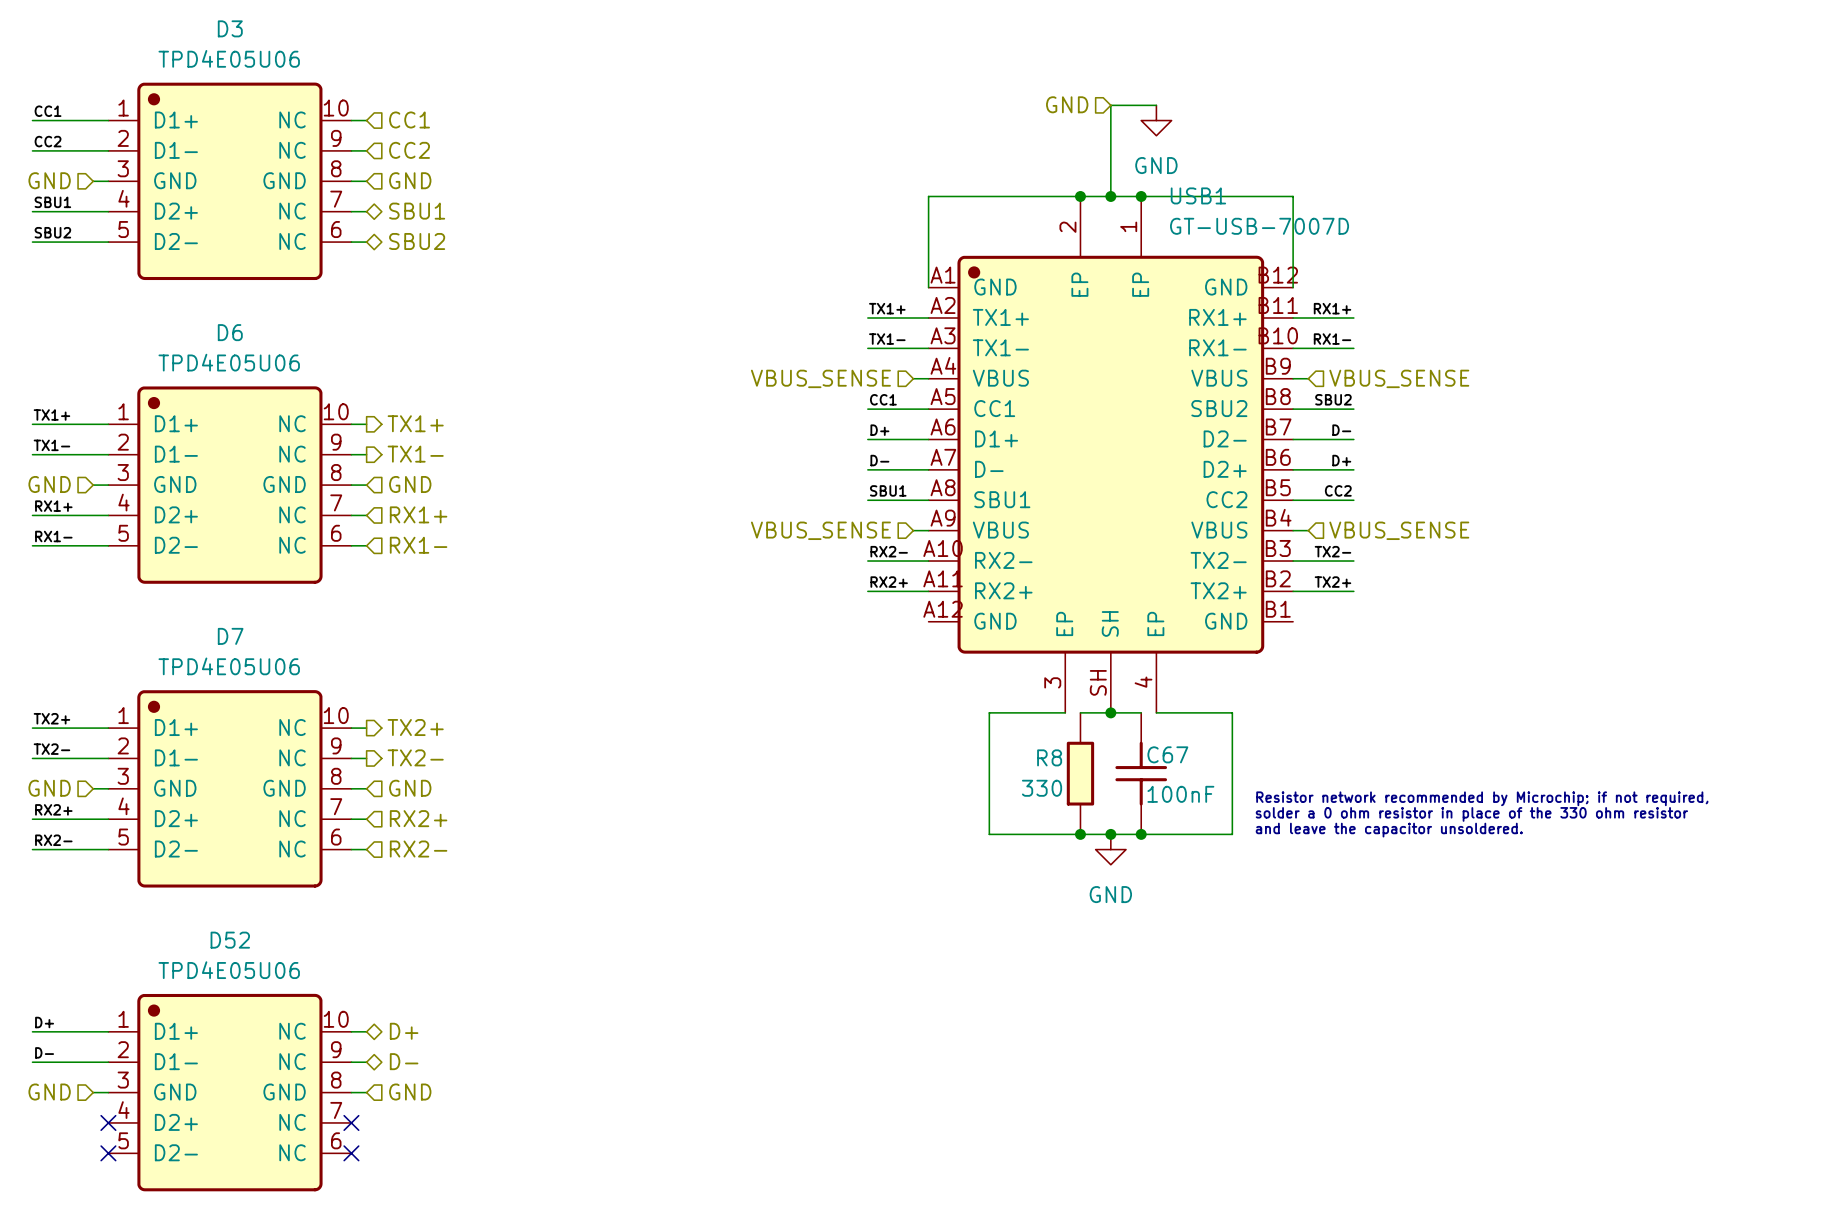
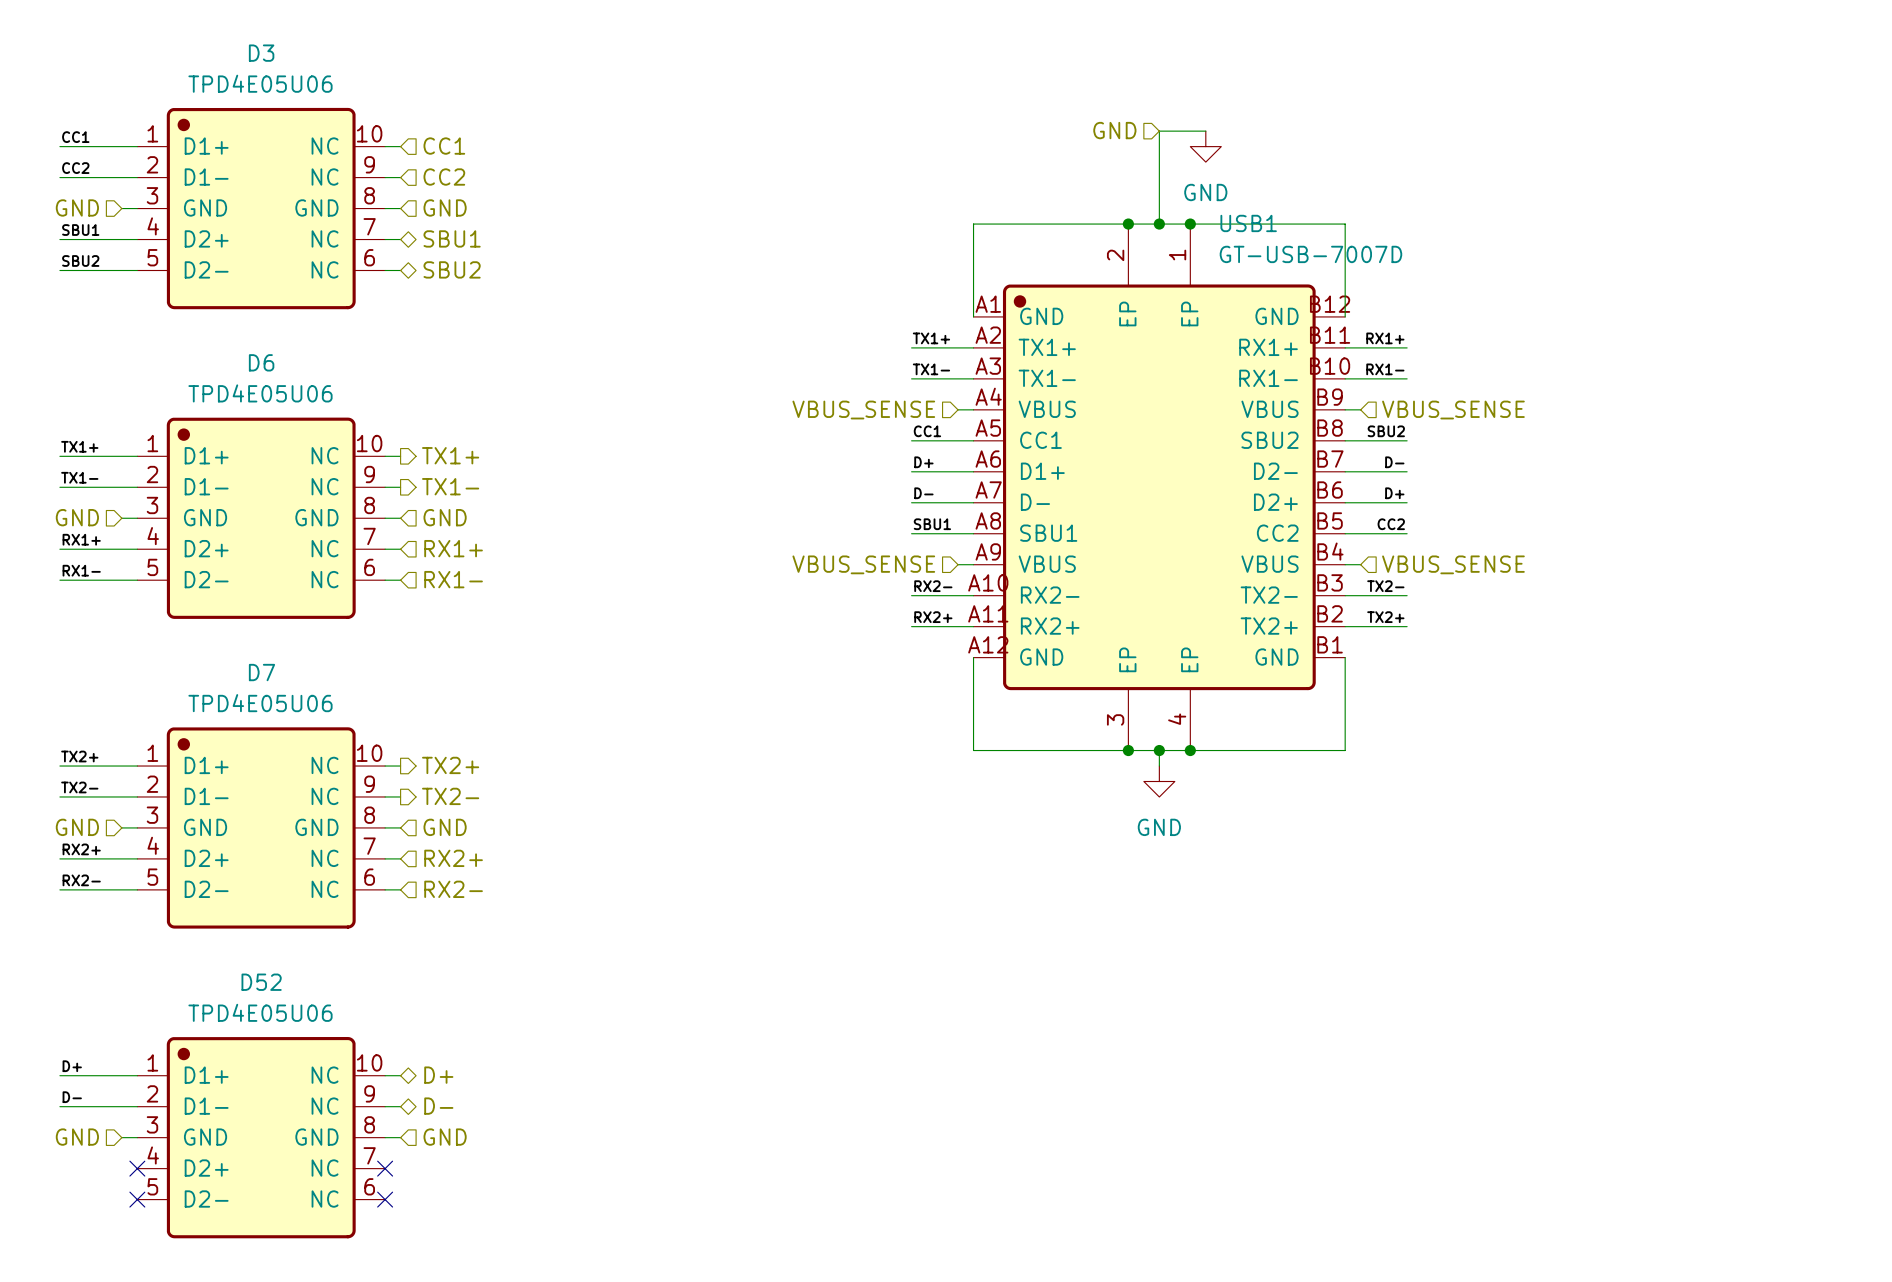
USB1 symbol: [928, 196, 1294, 713] -> [973, 224, 1346, 751]
wire: none -> (1345, 657) (1345, 750) (1283, 750)
wire: (989, 712) (989, 834) (1232, 834) (1232, 712) -> (1035, 750) (973, 750) (973, 657)
wire: none -> (1112, 750) (1128, 750)
junction: none -> (1128, 750)
wire: none -> (1159, 750) (1159, 766)
wire: none -> (1190, 750) (1205, 750)
junction: none -> (1190, 750)
R8: 330 (1080, 773) -> none
C67: 100nF (1141, 773) -> none
text: Resistor network recommended by Microchip; if not required, (1482, 798) -> none
text: solder a 0 ohm resistor in place of the 330 ohm resistor (1471, 814) -> none
text: and leave the capacitor unsoldered. (1389, 830) -> none
junction: (1080, 834) -> none
junction: (1110, 834) -> none
junction: (1141, 834) -> none
power symbol position: GND (1110, 849) -> GND (1159, 781)

